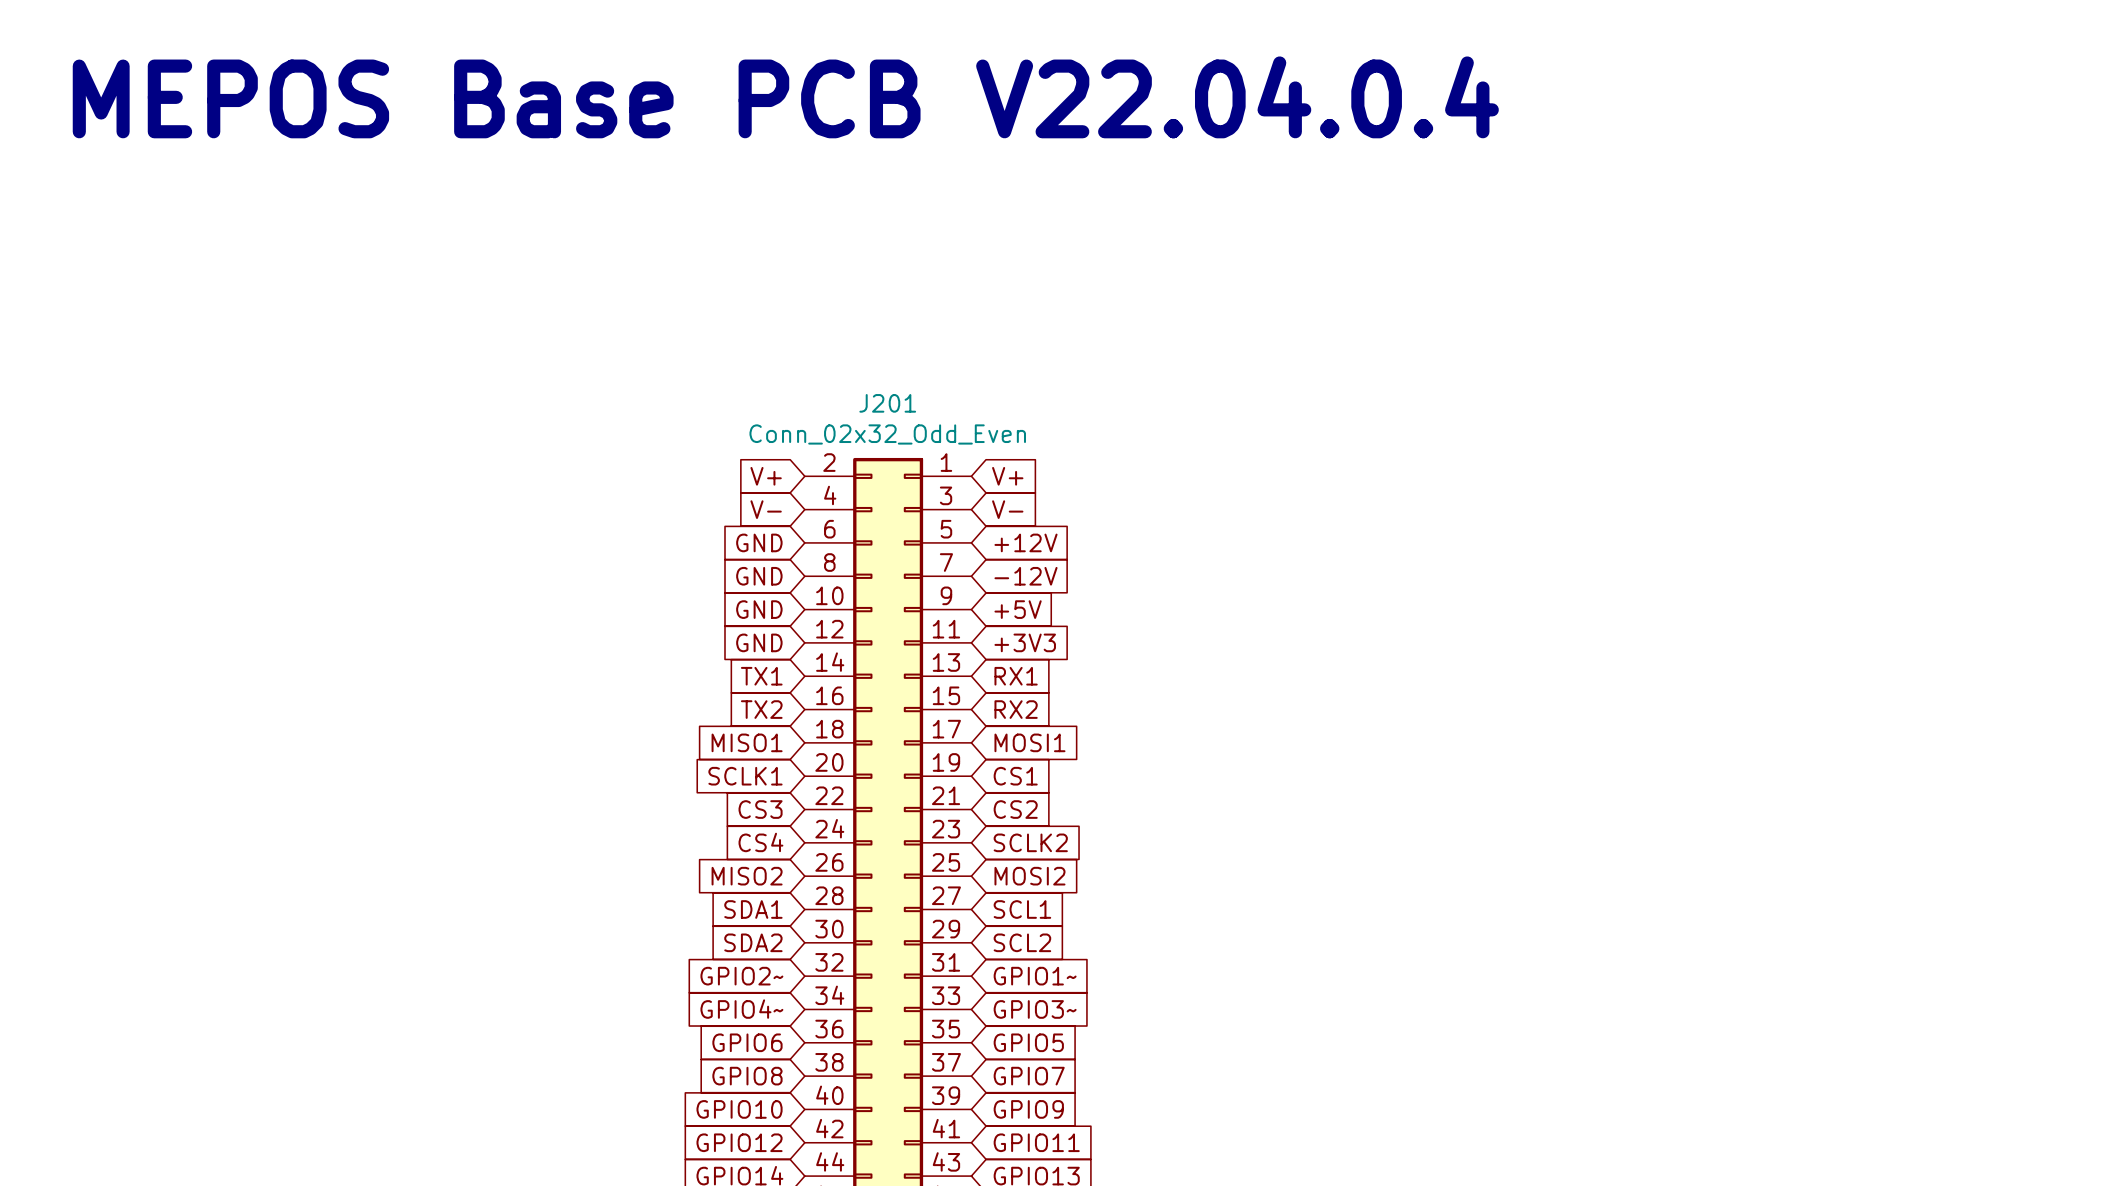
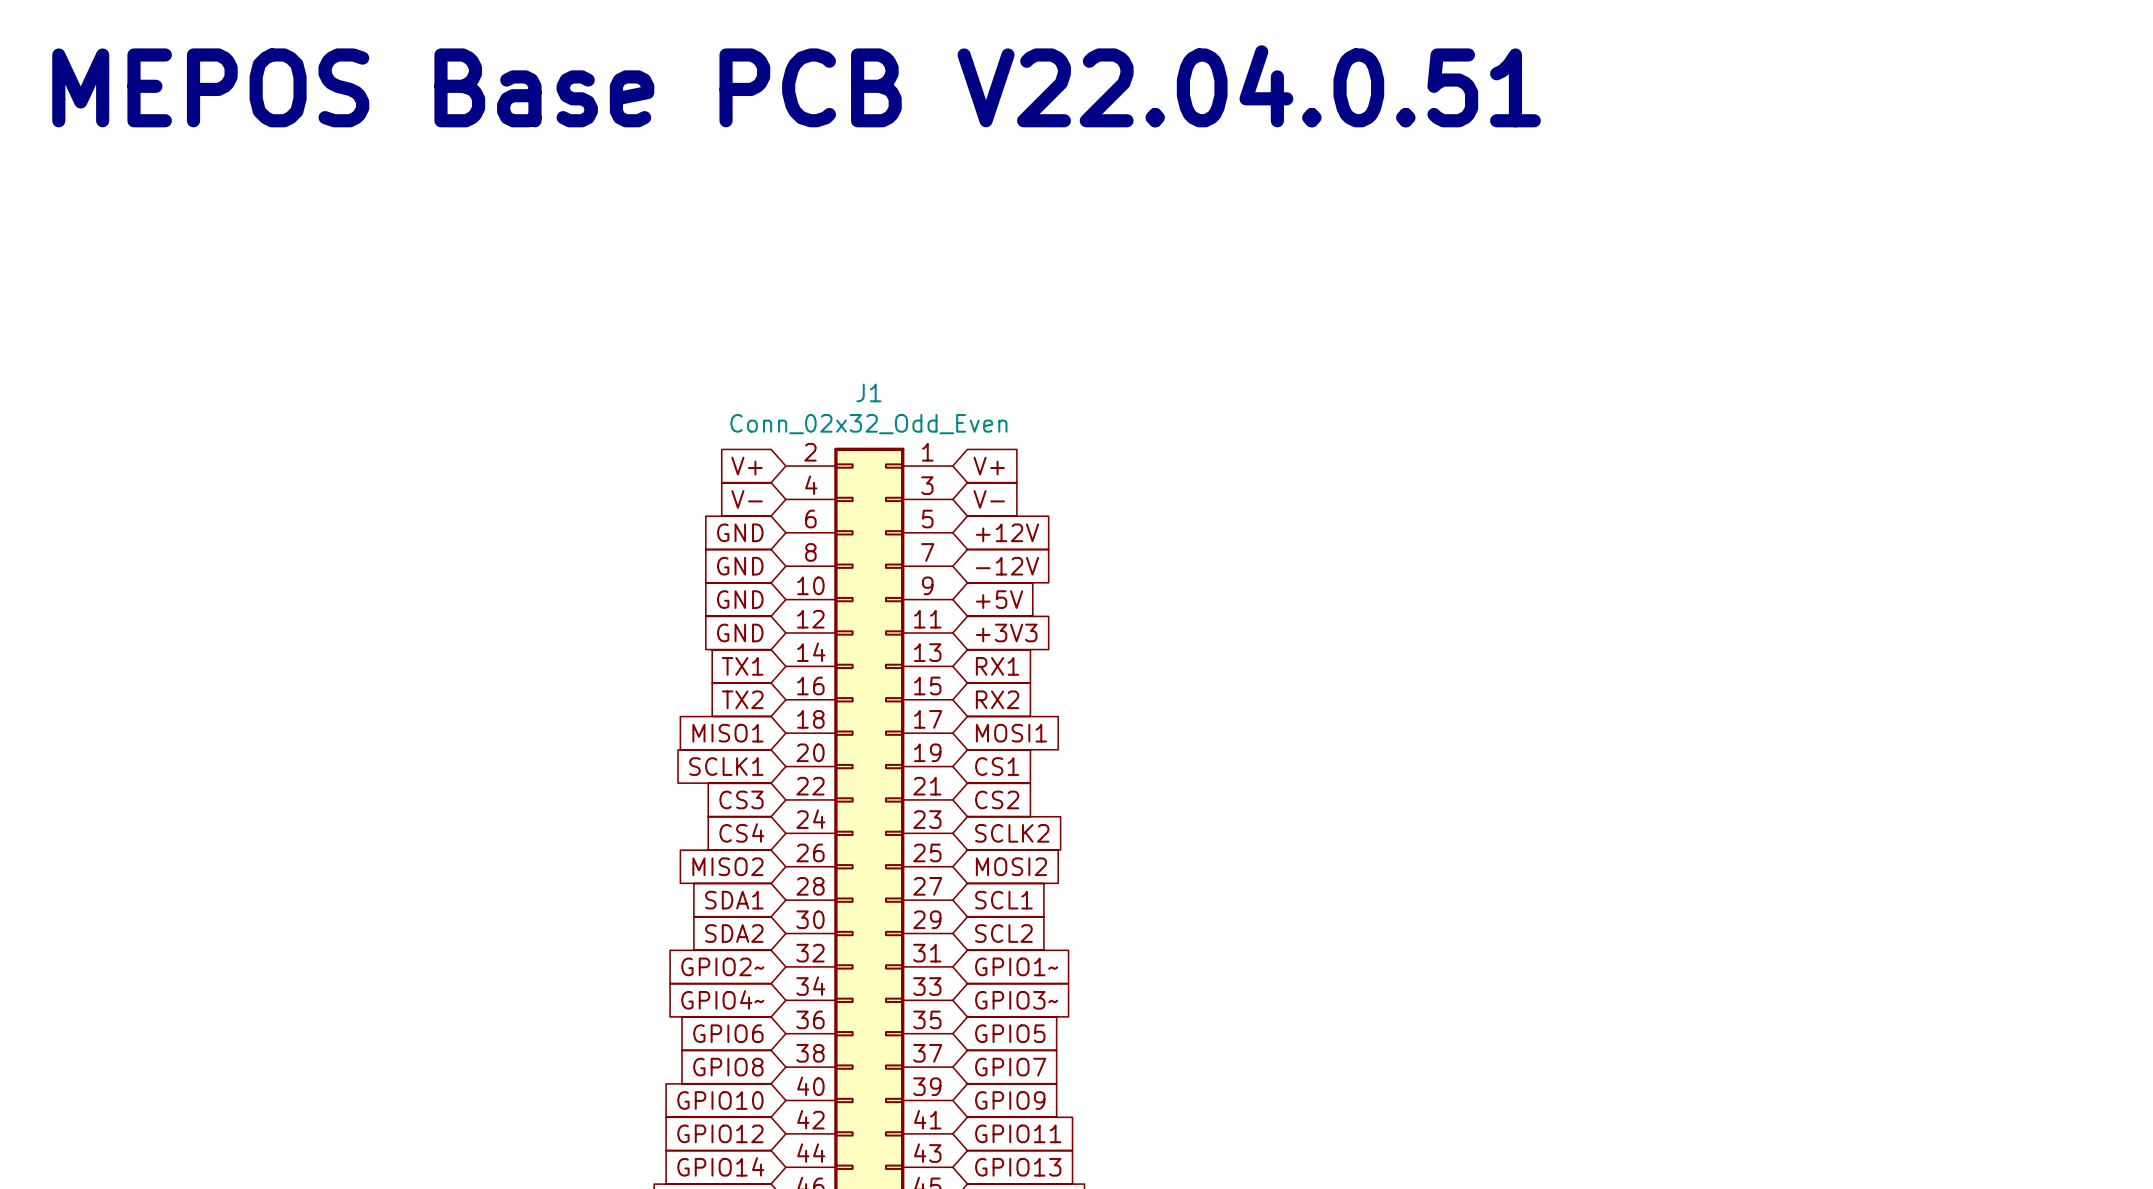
text: MEPOS Base PCB V22.04.0.4 (785, 97) -> MEPOS Base PCB V22.04.0.51 (796, 86)
J201 name: J201 (887, 403) -> J1 (868, 392)

